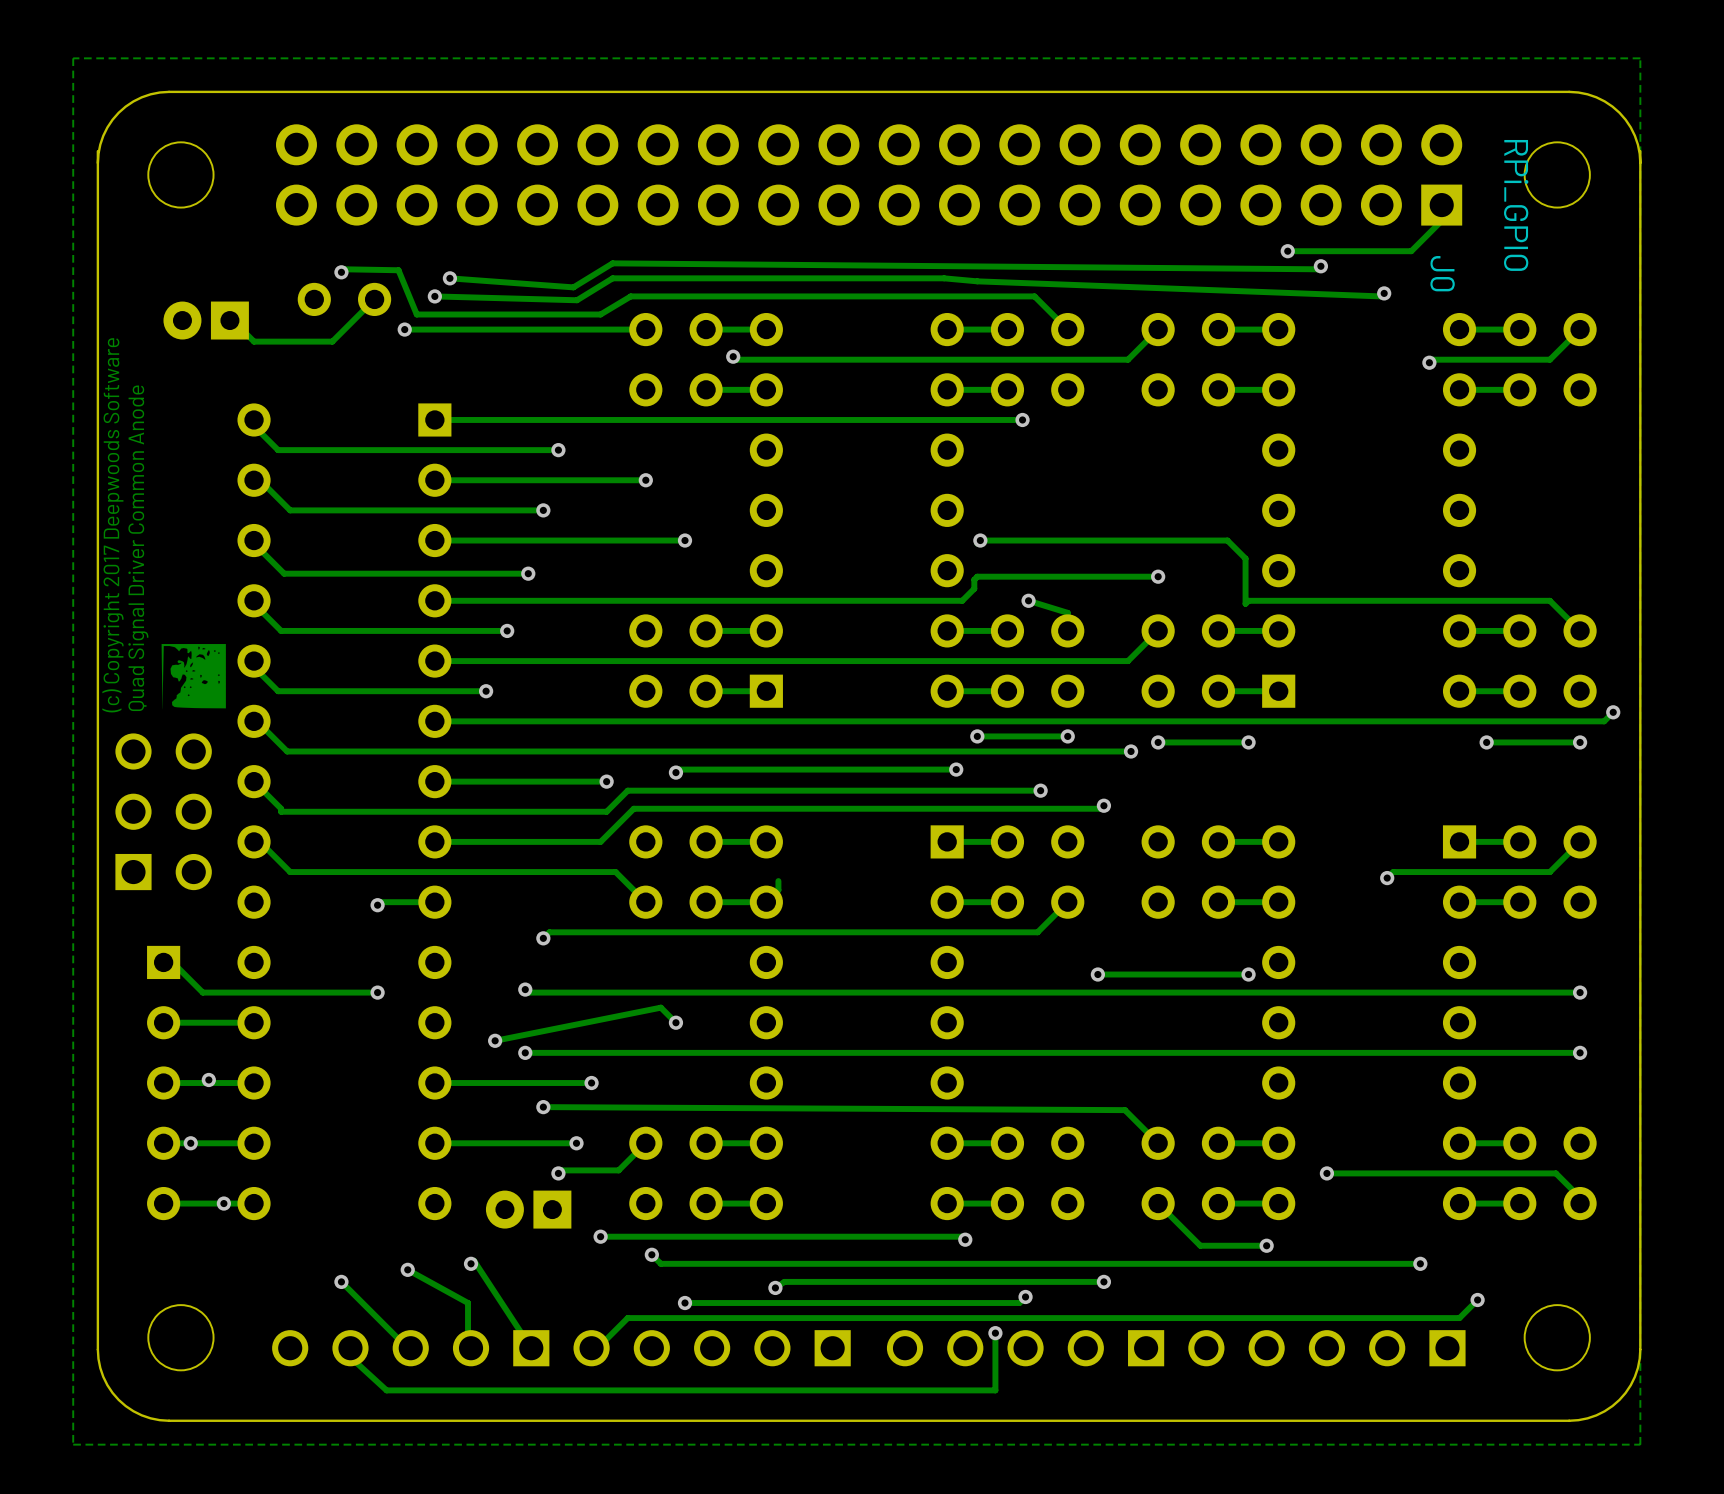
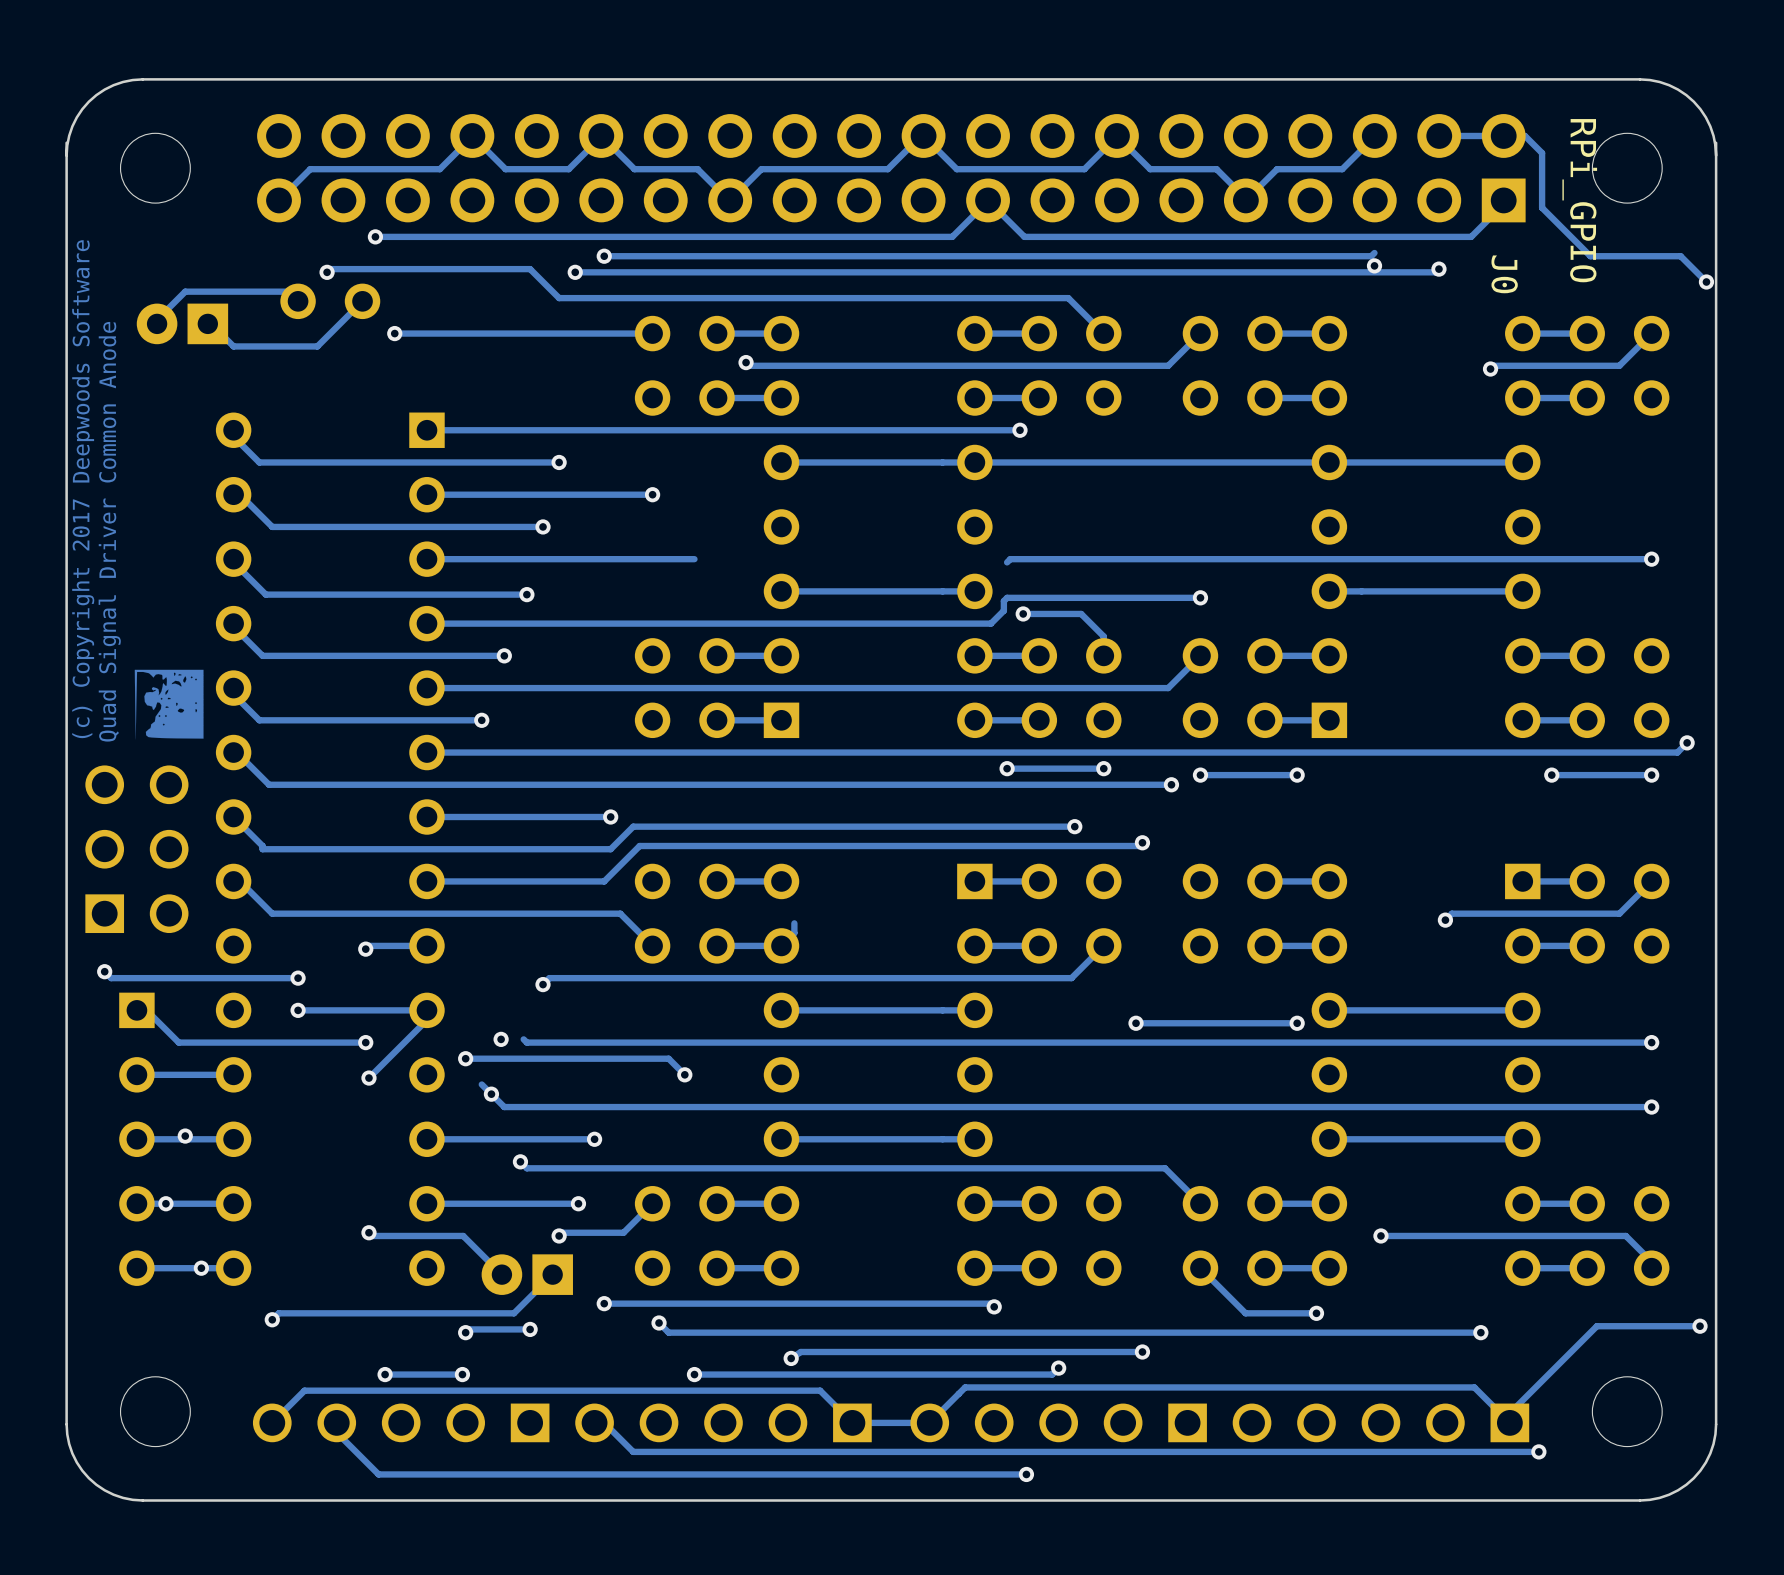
zone outline: (1640, 58) (73, 58) (73, 1444) (1640, 1444) (1640, 58) -> none
track: none -> (1374, 135) (1342, 169) (1277, 169) (1245, 200) (1216, 169) (1150, 169) (1116, 135) (1084, 169) (956, 169) (923, 135) (921, 135) (887, 169) (761, 169) (730, 200) (697, 169) (634, 169) (601, 135) (568, 169) (505, 169) (472, 135) (439, 169) (310, 169) (279, 200)
track: none -> (1439, 135) (1524, 135) (1542, 153) (1542, 207) (1590, 256) (1680, 256) (1706, 282)
track: (1441, 208) (1441, 220) (1411, 251) (1287, 251) -> (1503, 204) (1471, 236) (1024, 236) (988, 200) (952, 236) (375, 236)
via: none -> (375, 236)
via: (1287, 251) -> none
track: none -> (1374, 252) (1371, 256) (604, 256)
via: none -> (604, 256)
track: (1320, 266) (1317, 269) (612, 263) (573, 287) (449, 278) -> none
track: (344, 269) (398, 270) (416, 314) (600, 314) (630, 296) -> (330, 269) (530, 269) (559, 298) (636, 298)
track: none -> (1438, 269) (1435, 272) (575, 272)
via: none -> (575, 272)
via: (449, 278) -> none
via: none -> (1706, 282)
track: (1384, 293) (1381, 296) (977, 281) (944, 278) (612, 278) (577, 300) (434, 296) -> none
via position: (1384, 293) -> (1438, 269)
via: (434, 296) -> none
track: none -> (298, 301) (288, 291) (185, 291) (157, 319) (157, 323)
track: (1022, 419) (989, 419) -> none
via position: (1022, 419) -> (1019, 430)
track: none -> (1522, 462) (781, 462)
via: (685, 540) -> none
via: (980, 540) -> none
track: (1227, 540) (1245, 558) (1245, 603) (1248, 600) (1549, 600) (1580, 630) -> (1274, 559) (1651, 559)
via: none -> (1651, 559)
track: none -> (974, 591) (781, 591)
track: none -> (1522, 591) (1329, 591)
via: none -> (1023, 613)
track: (1028, 600) (1067, 612) -> (1023, 613) (1081, 613) (1103, 636)
via: (1028, 600) -> none
track: (956, 769) (678, 769) (675, 772) -> none
via: (956, 769) -> none
via: (675, 772) -> none
track: none -> (104, 971) (111, 978) (298, 978)
via: none -> (104, 971)
via: none -> (298, 978)
track: none -> (298, 1010) (426, 1010) (426, 1020) (368, 1078)
via: none -> (298, 1010)
track: none -> (974, 1010) (781, 1010)
track: none -> (1522, 1010) (1329, 1010)
via position: (525, 989) -> (501, 1039)
via: none -> (465, 1058)
track: (660, 1007) (495, 1040) -> (668, 1058) (465, 1058)
via: none -> (368, 1078)
track: none -> (481, 1084) (504, 1107) (523, 1107)
via: (525, 1052) -> none
track: none -> (974, 1139) (781, 1139)
track: none -> (1522, 1139) (1329, 1139)
track: (543, 1107) (1125, 1110) -> (520, 1161) (526, 1168) (1165, 1168)
via position: (543, 1107) -> (520, 1161)
track: none -> (368, 1232) (372, 1235) (463, 1235) (501, 1274)
via: none -> (368, 1232)
track: none -> (552, 1274) (514, 1313) (278, 1313) (272, 1319)
via: none -> (272, 1319)
via: none -> (1700, 1326)
track: (474, 1260) (531, 1348) -> (468, 1329) (530, 1329)
via: none -> (530, 1329)
track: (407, 1269) (468, 1303) (468, 1345) (471, 1348) -> none
via: (407, 1269) -> none
track: (341, 1281) (407, 1348) (410, 1348) -> none
via: (341, 1281) -> none
track: (1477, 1299) (1459, 1318) (802, 1318) -> (1700, 1326) (1596, 1326) (1509, 1413) (1509, 1422) (1474, 1387) (965, 1387) (929, 1422) (855, 1422) (852, 1419) (852, 1422) (820, 1390)
via position: (1477, 1299) -> (1538, 1451)
via: none -> (385, 1374)
track: none -> (462, 1374) (385, 1374)
via: none -> (462, 1374)
track: (627, 1318) (597, 1348) -> (633, 1390) (304, 1390) (272, 1422)
track: (995, 1333) (995, 1390) (386, 1390) (350, 1357) -> (1026, 1474) (378, 1474) (336, 1432)
via position: (995, 1333) -> (1026, 1474)
track: none -> (601, 1422) (604, 1422) (633, 1451) (1538, 1451)

